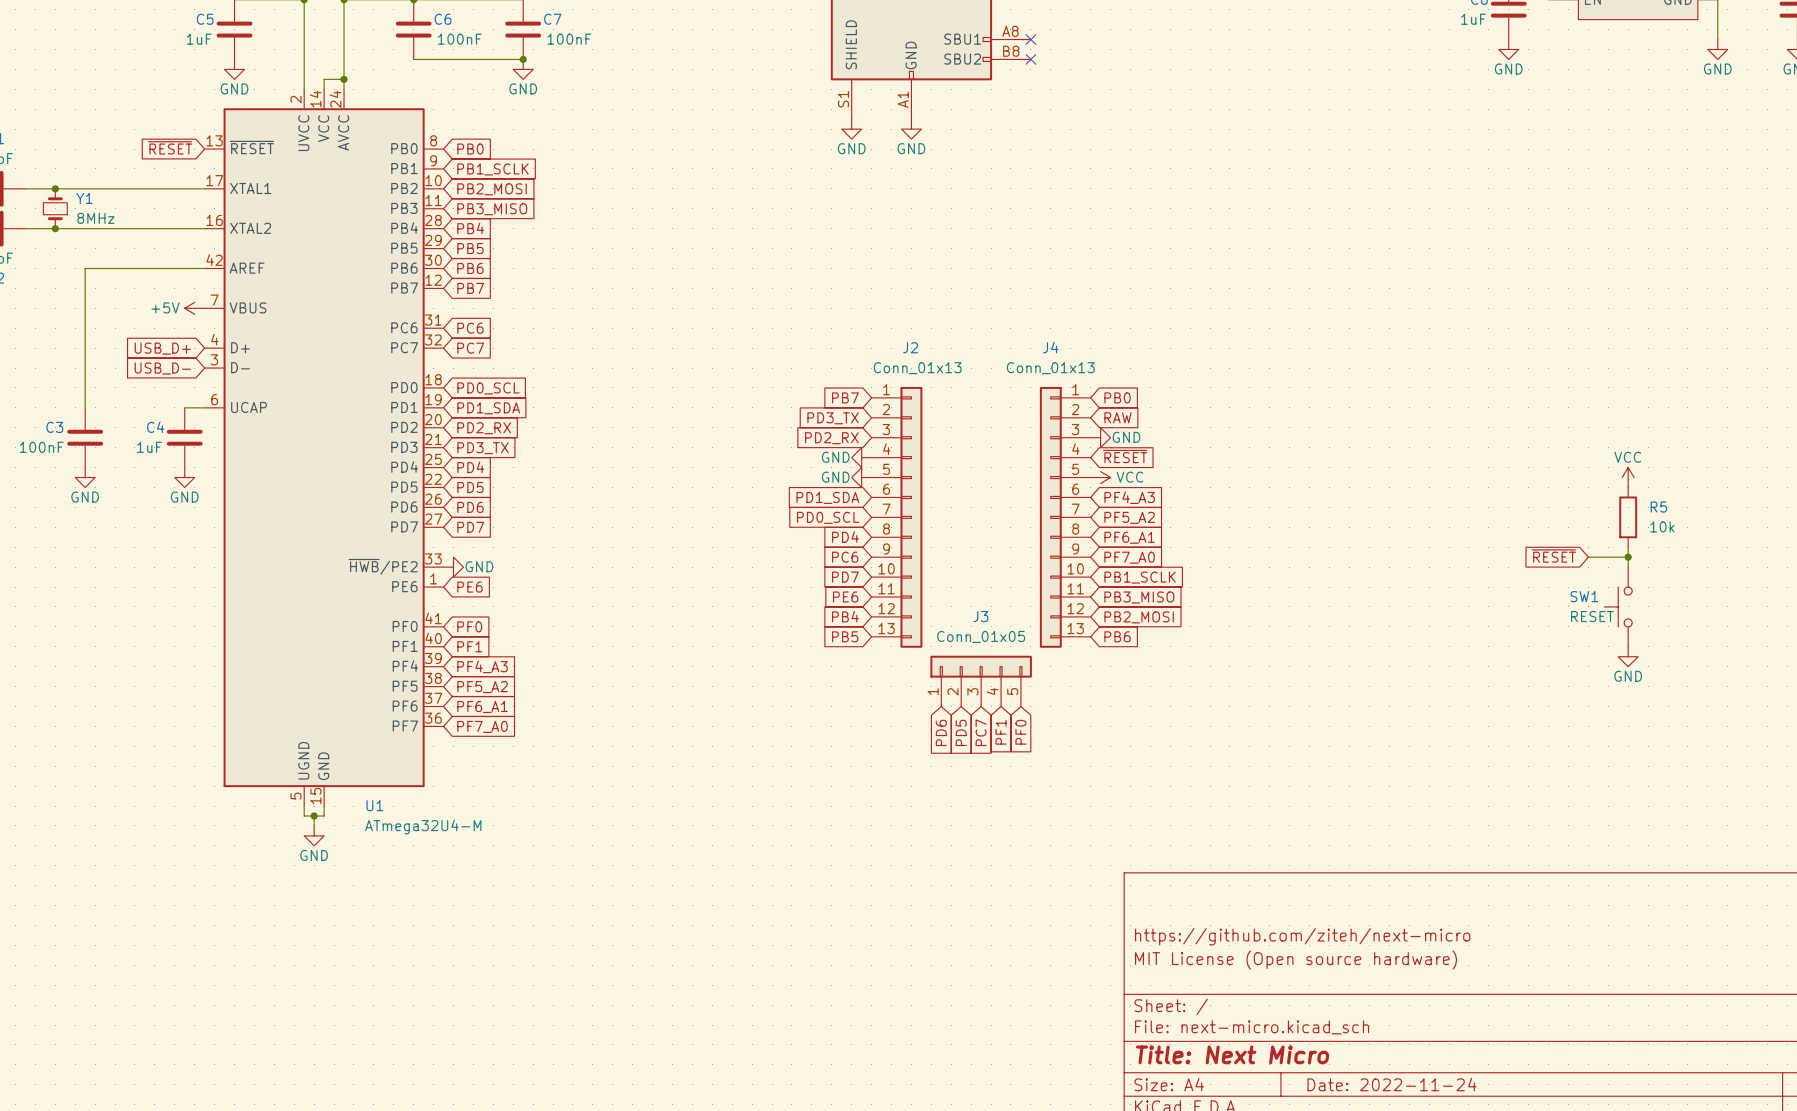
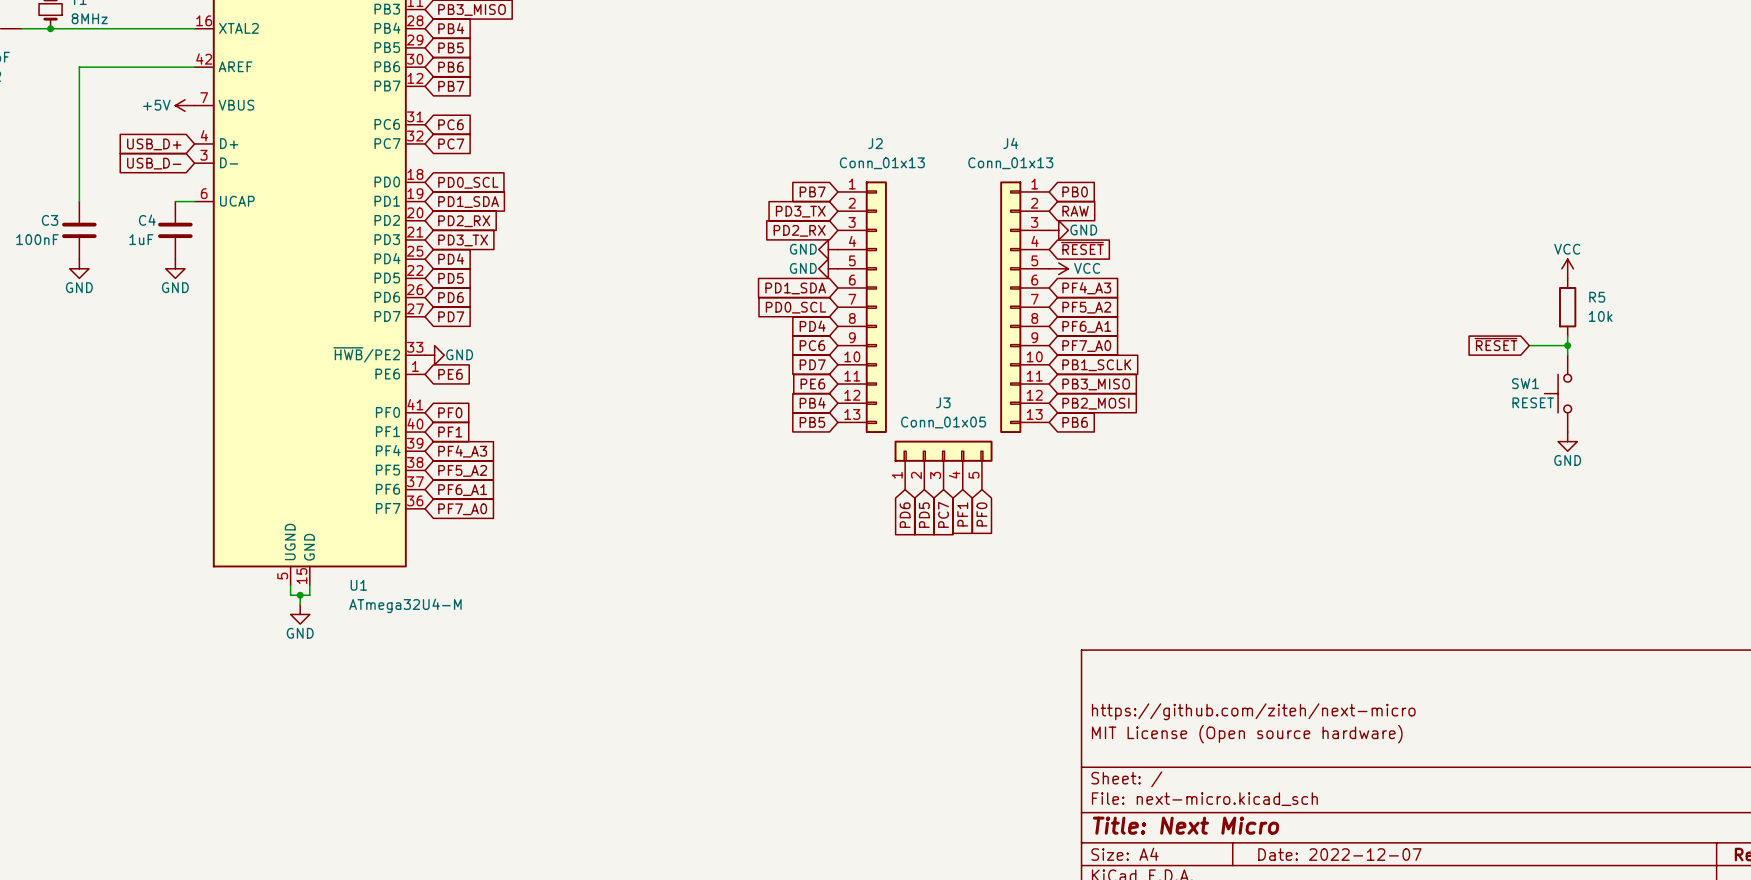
title block: Date: 2022-11-24 (1392, 1084) -> Date: 2022-12-07 (1339, 854)

